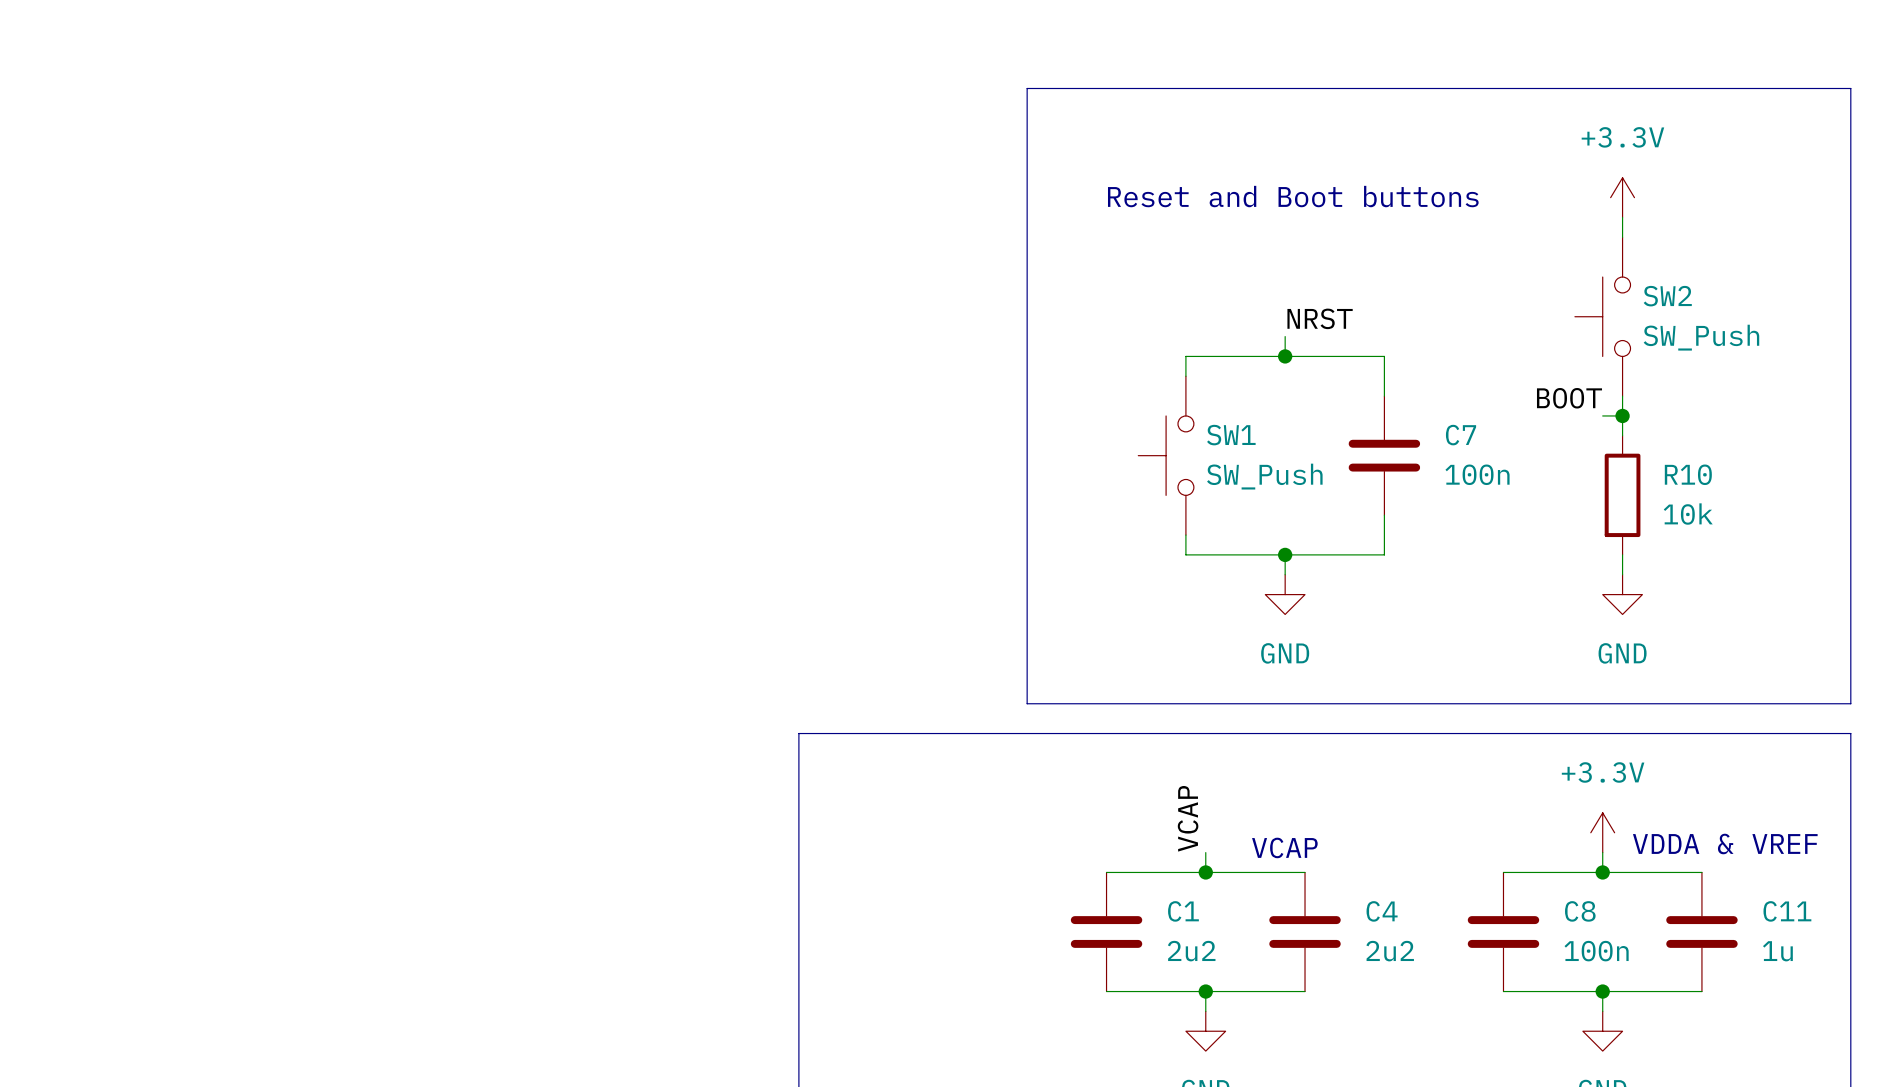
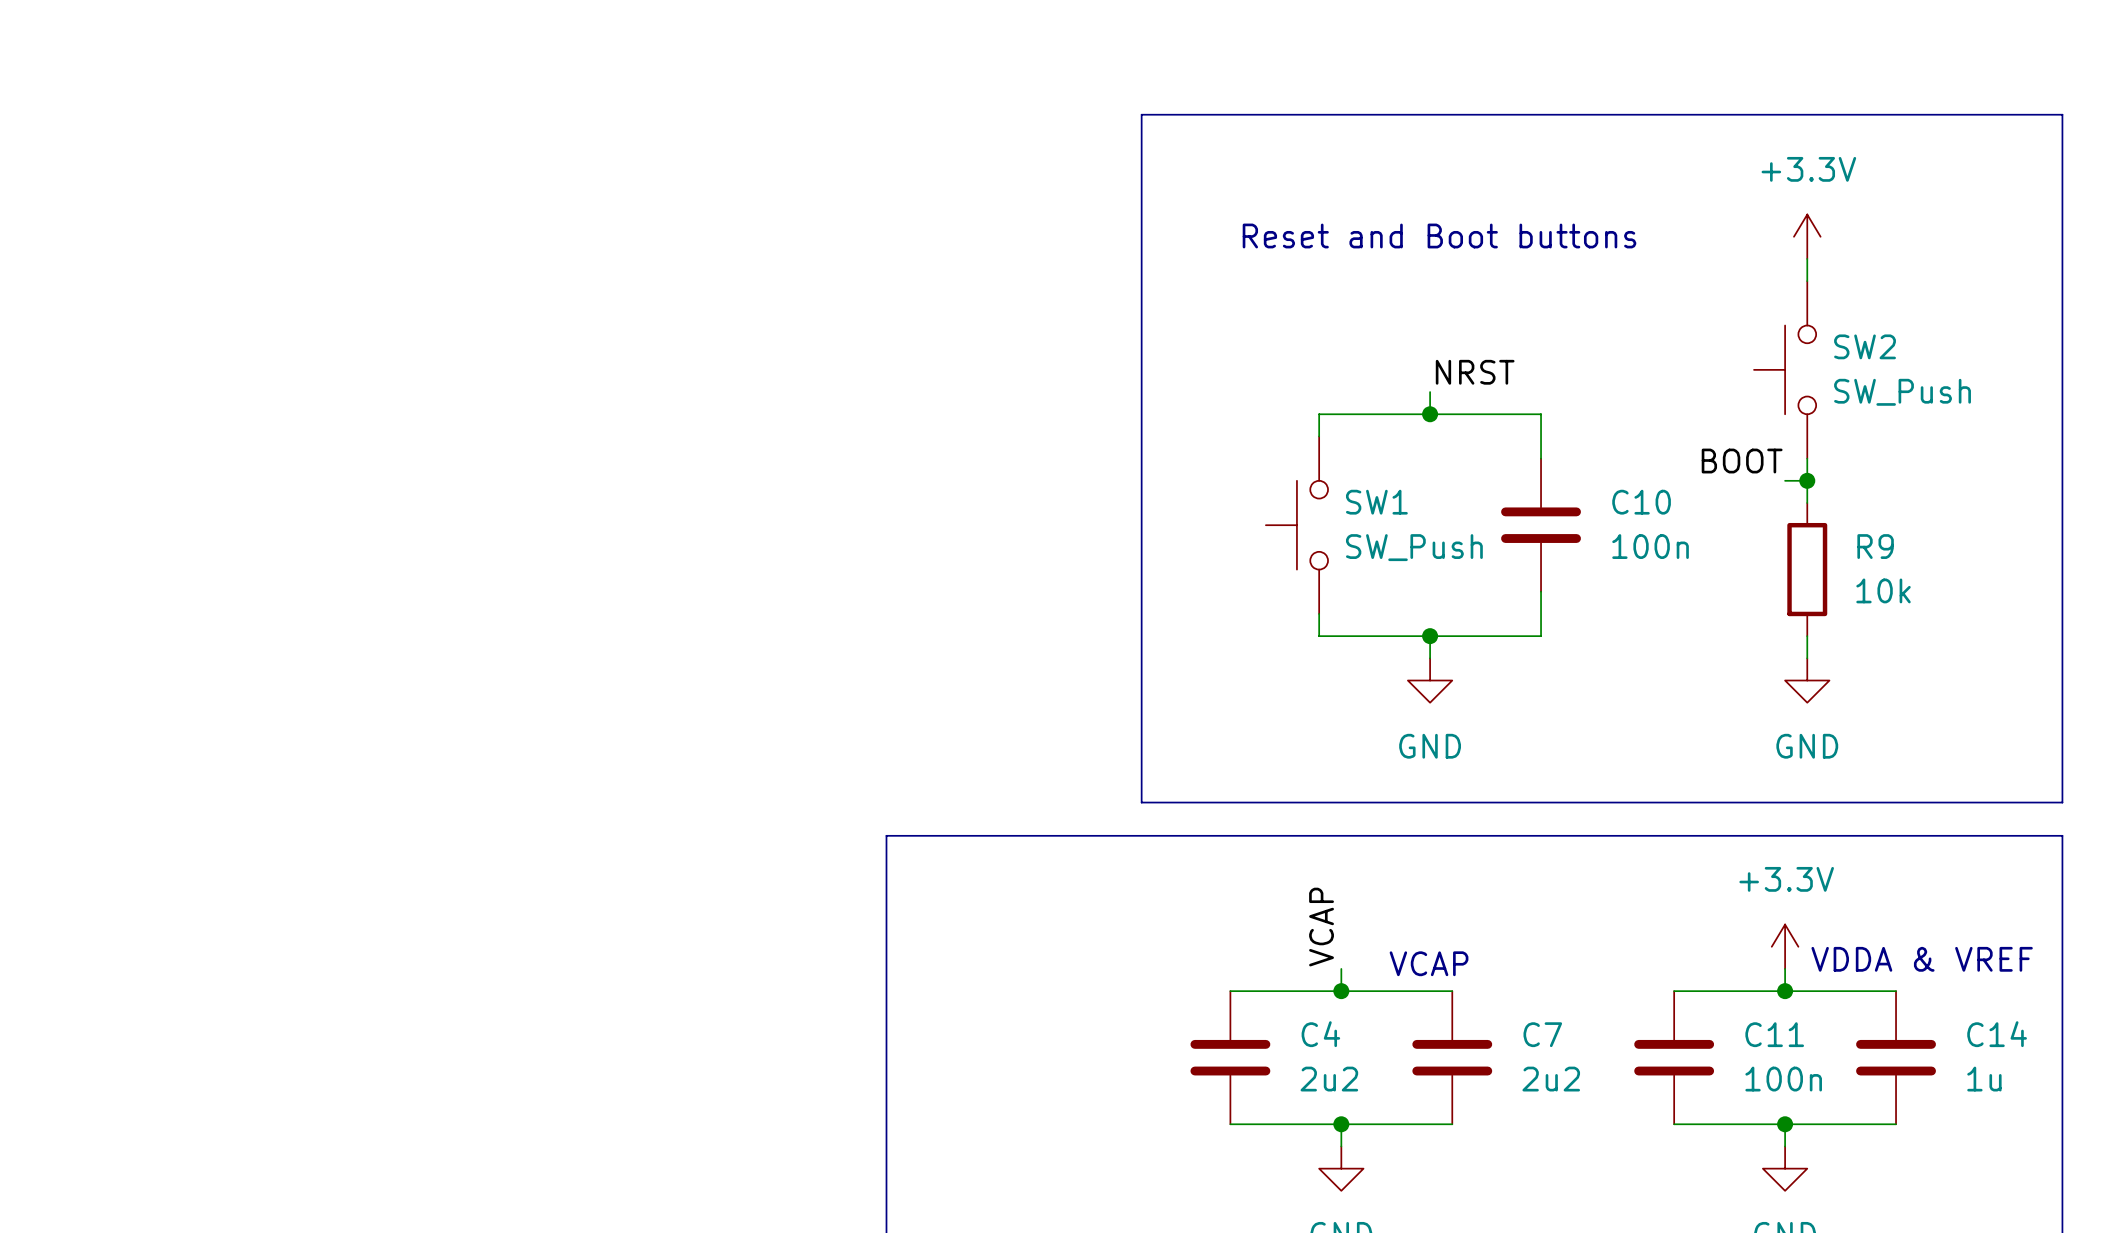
C7 name: C7 (1461, 435) -> C10 (1641, 502)
R10 name: R10 (1688, 474) -> R9 (1875, 546)
C1 name: C1 (1183, 911) -> C4 (1320, 1034)
C4 name: C4 (1382, 911) -> C7 (1542, 1034)
C8 name: C8 (1580, 911) -> C11 (1774, 1034)
C11 name: C11 (1787, 911) -> C14 (1997, 1034)

